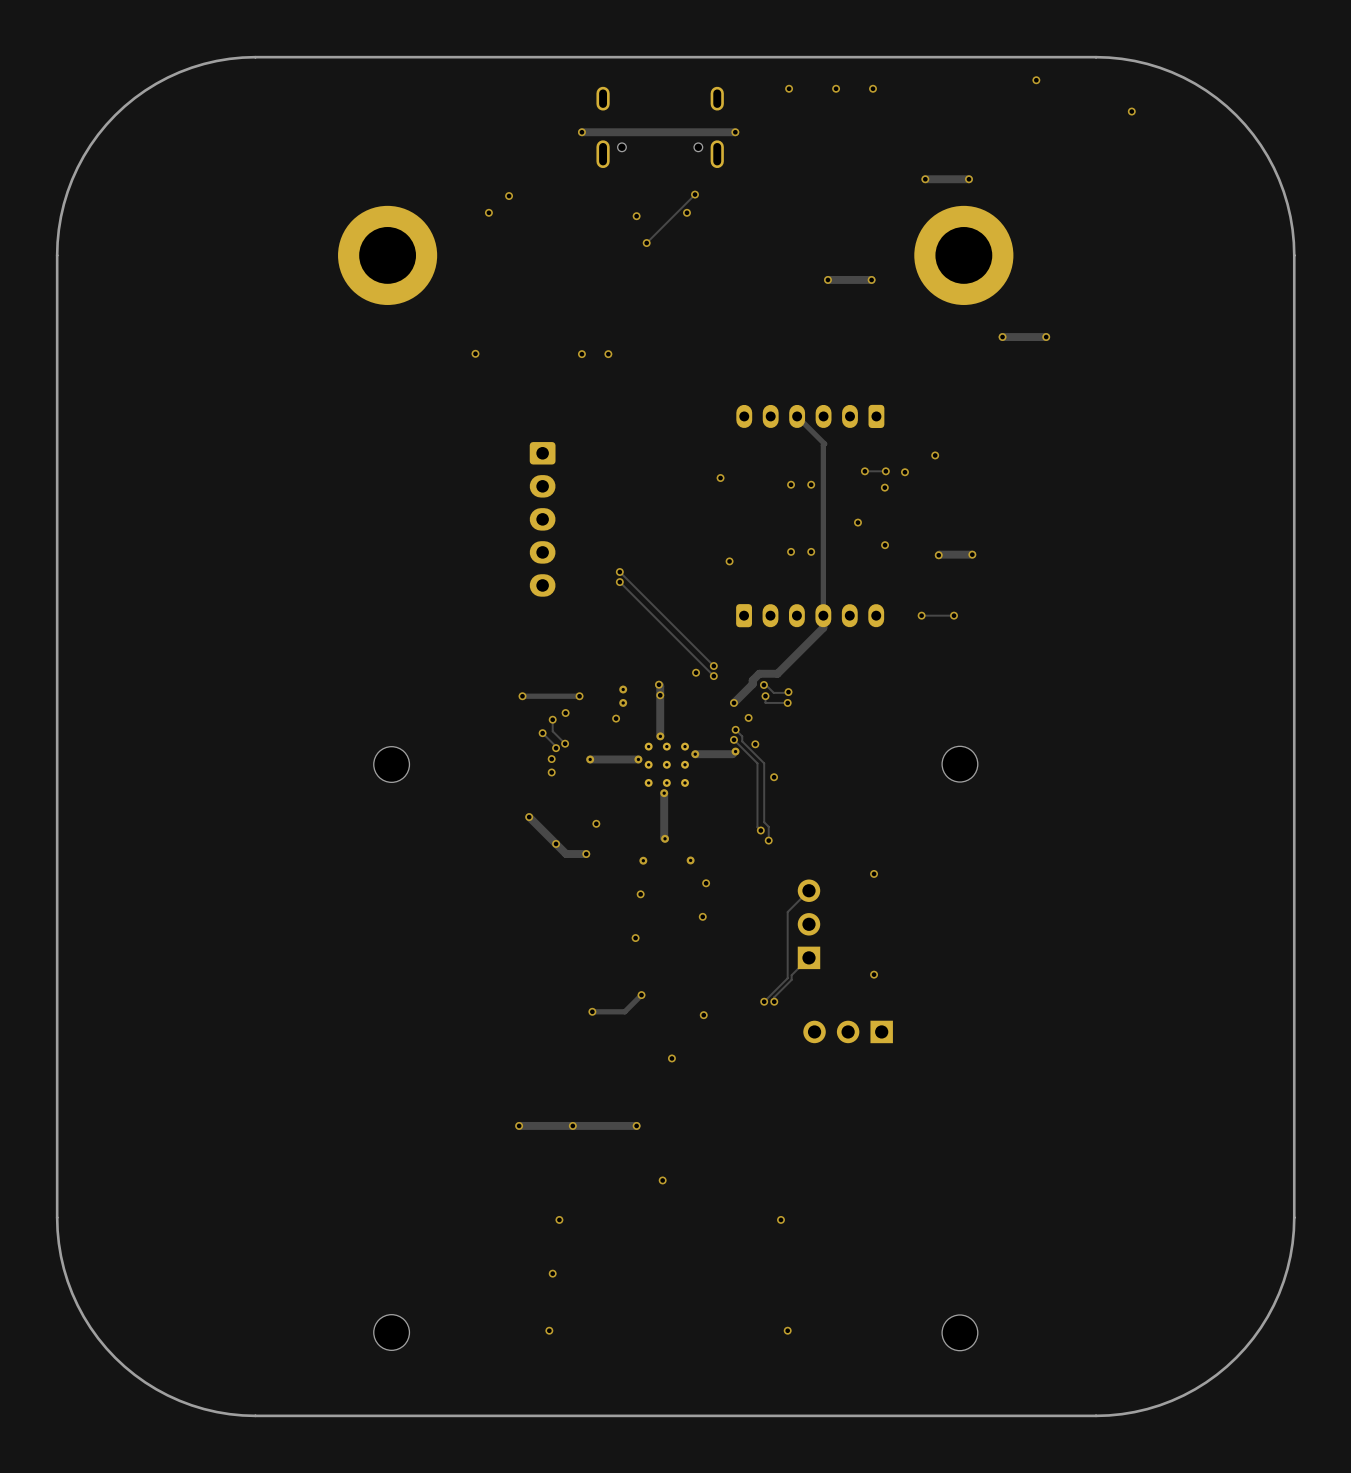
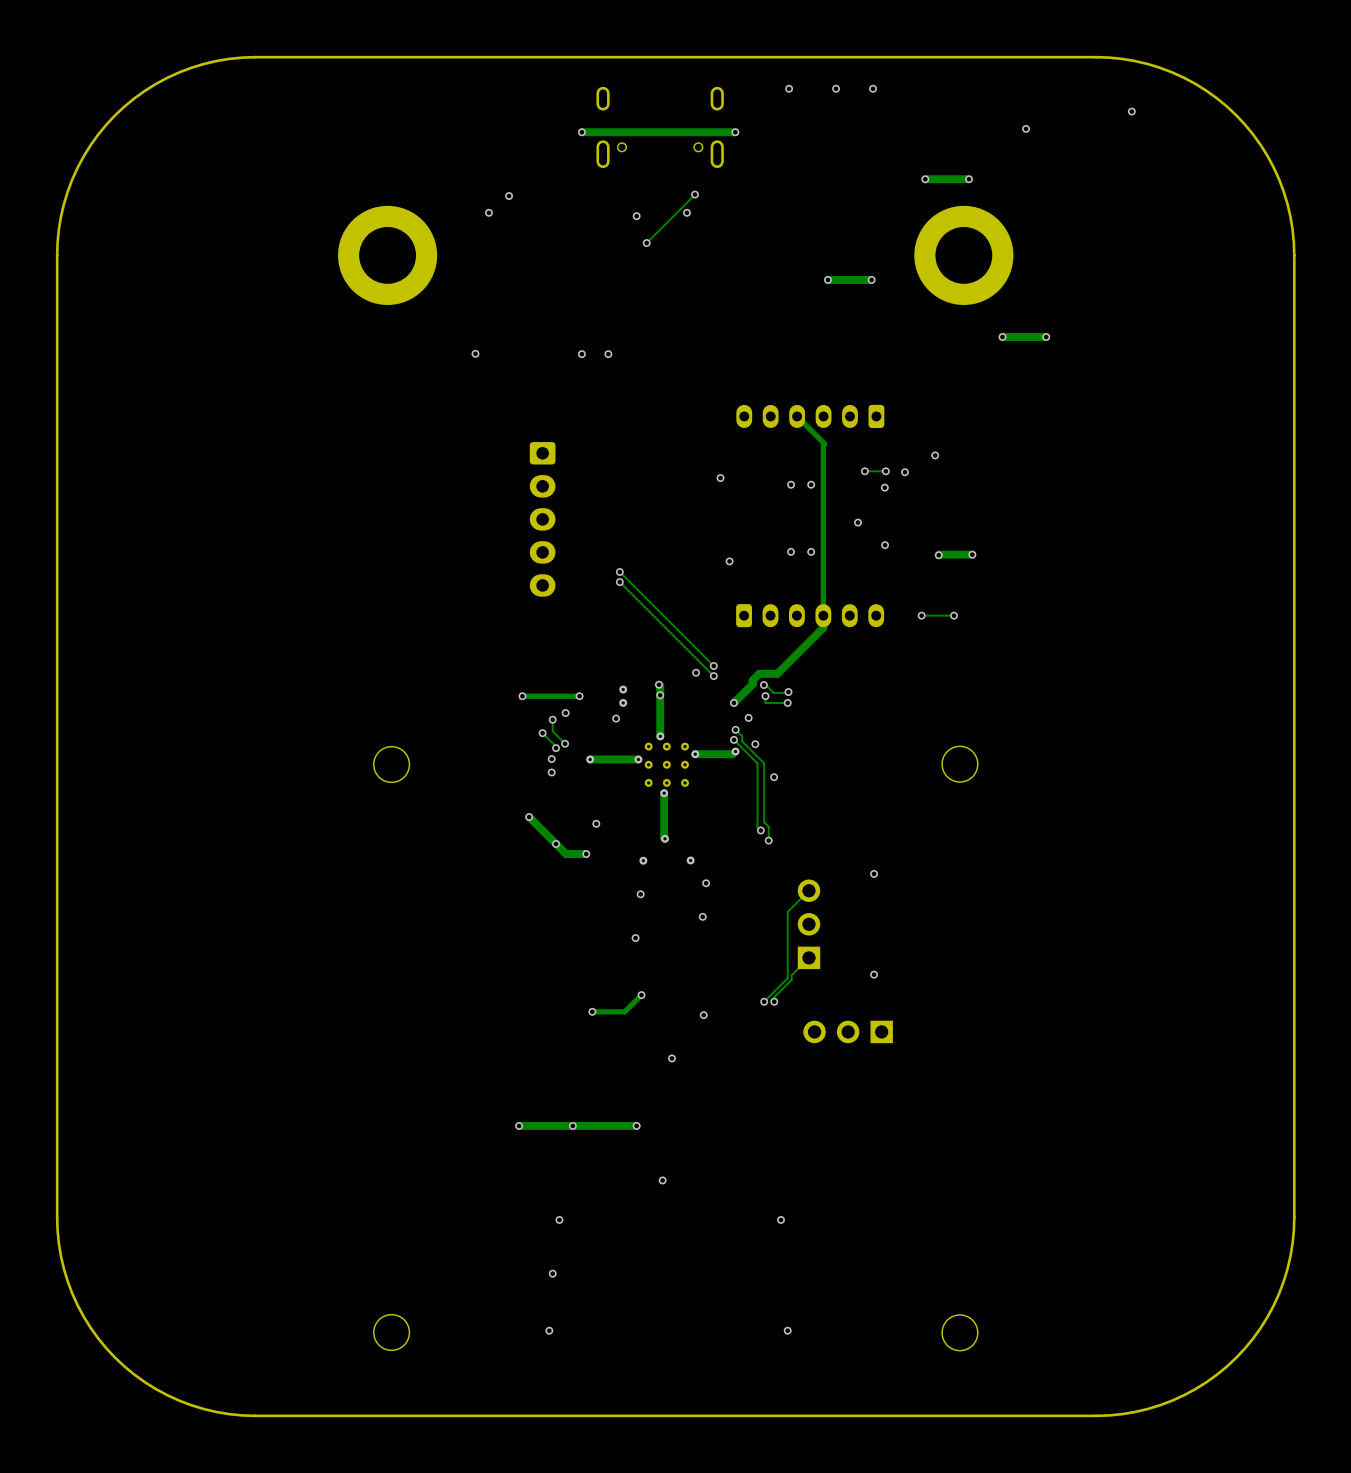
via position: (1036, 80) -> (1026, 128)

